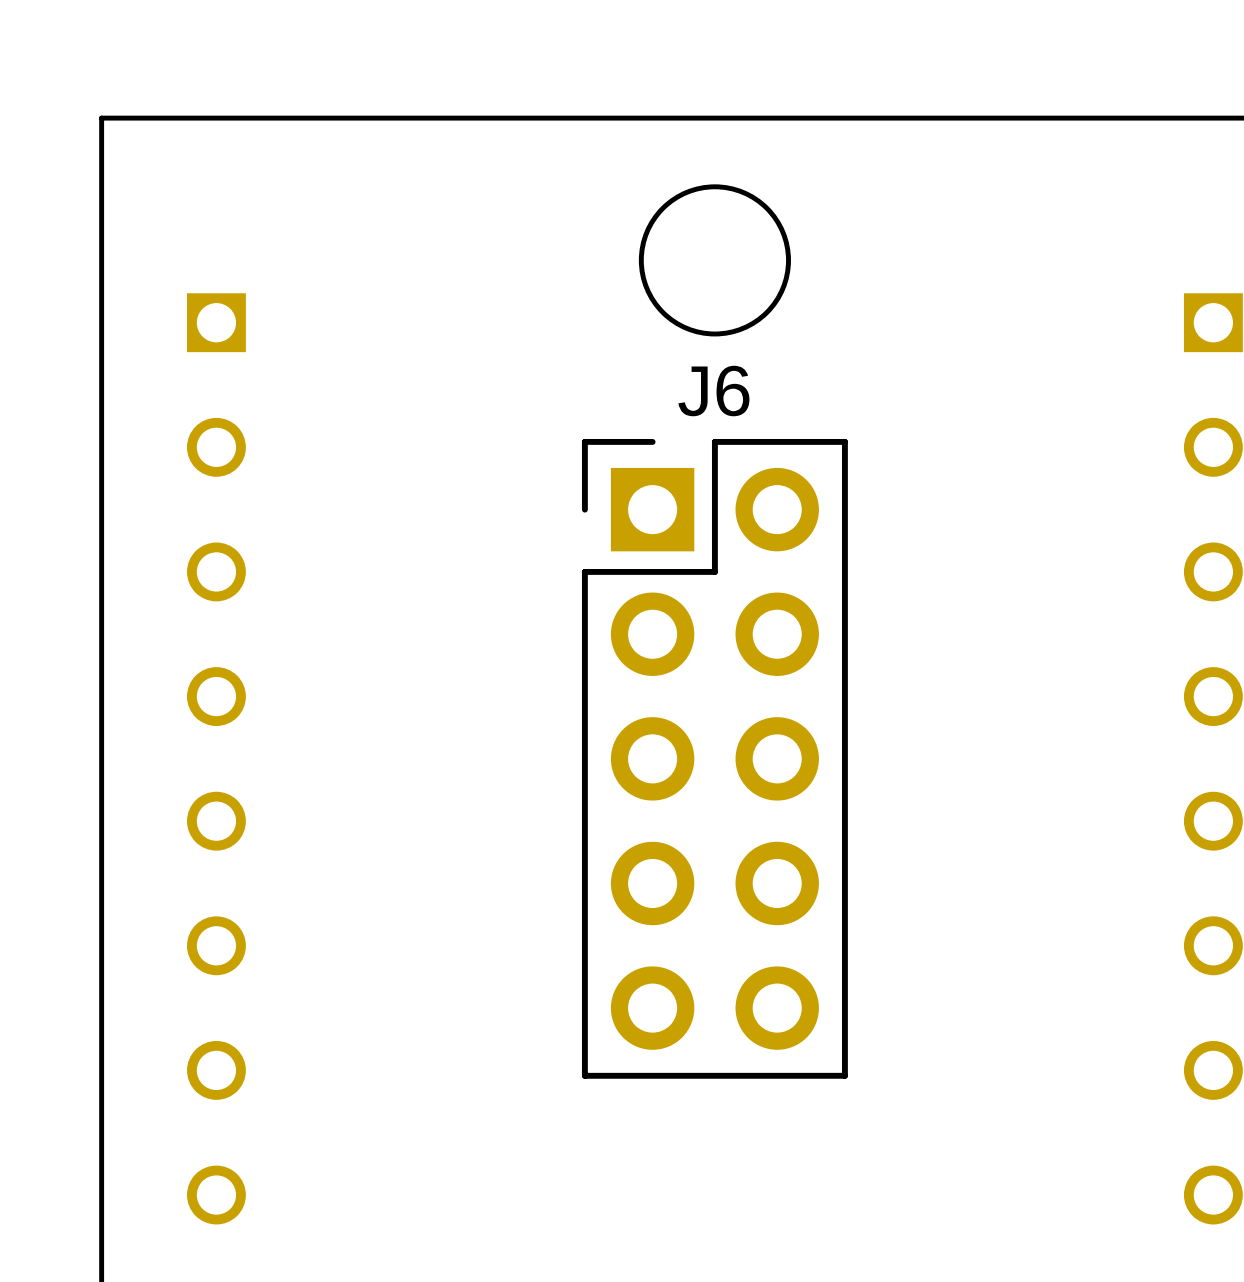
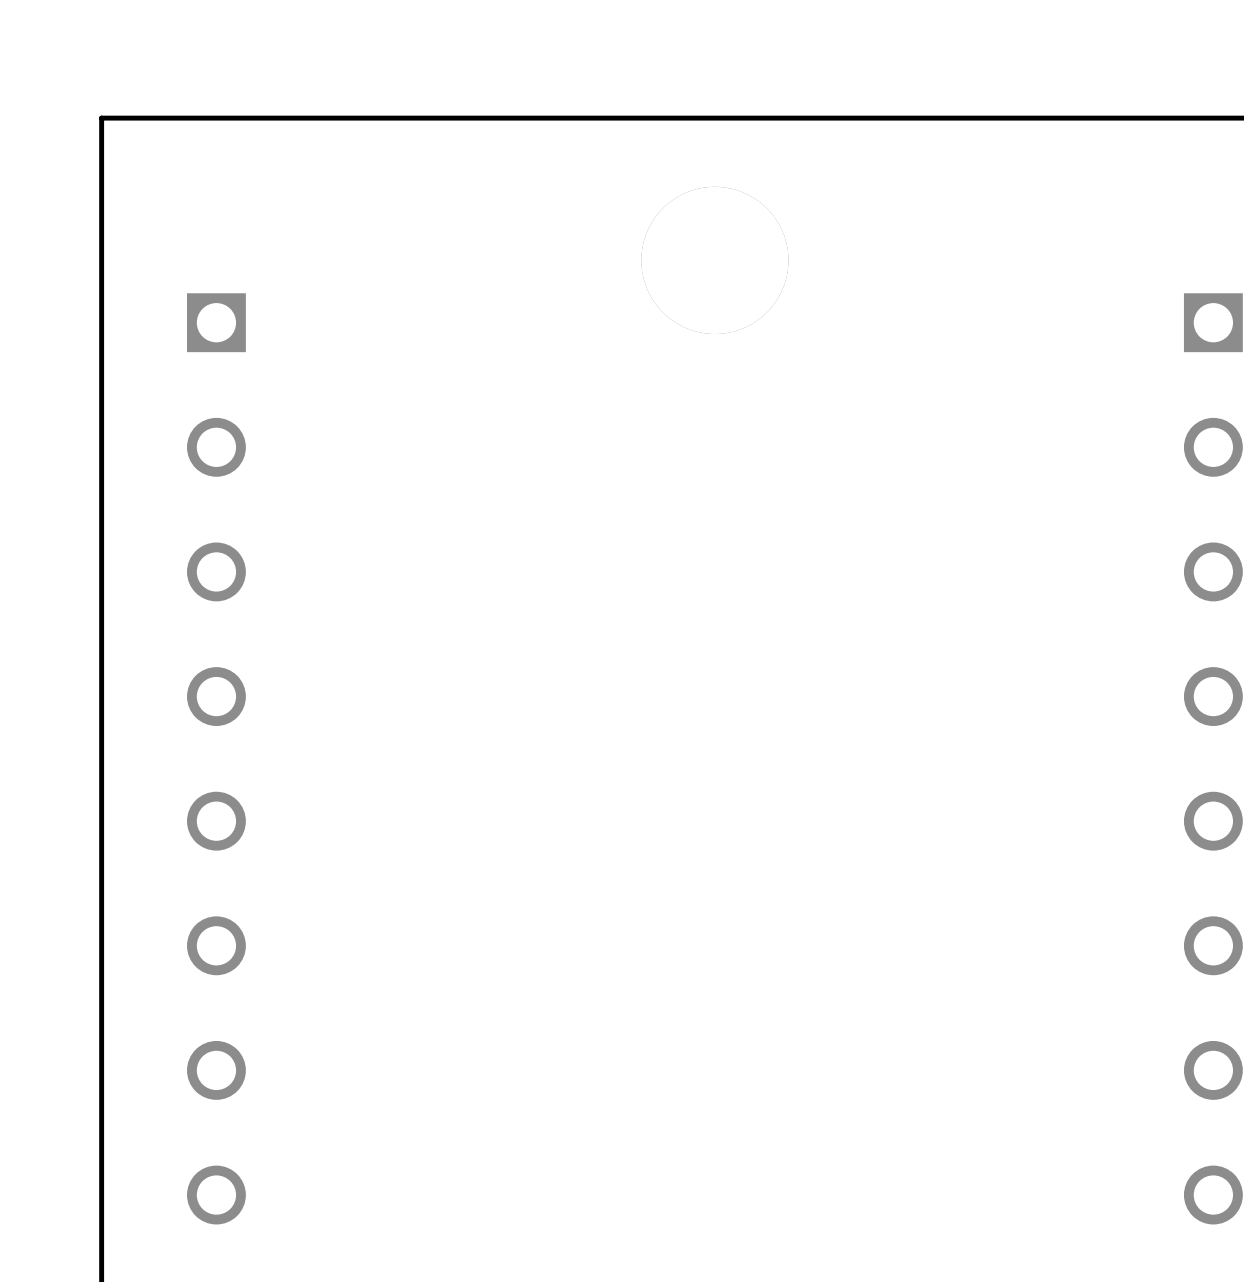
round board edge: [638, 184, 791, 337] -> none
J6: (714, 758) -> none

